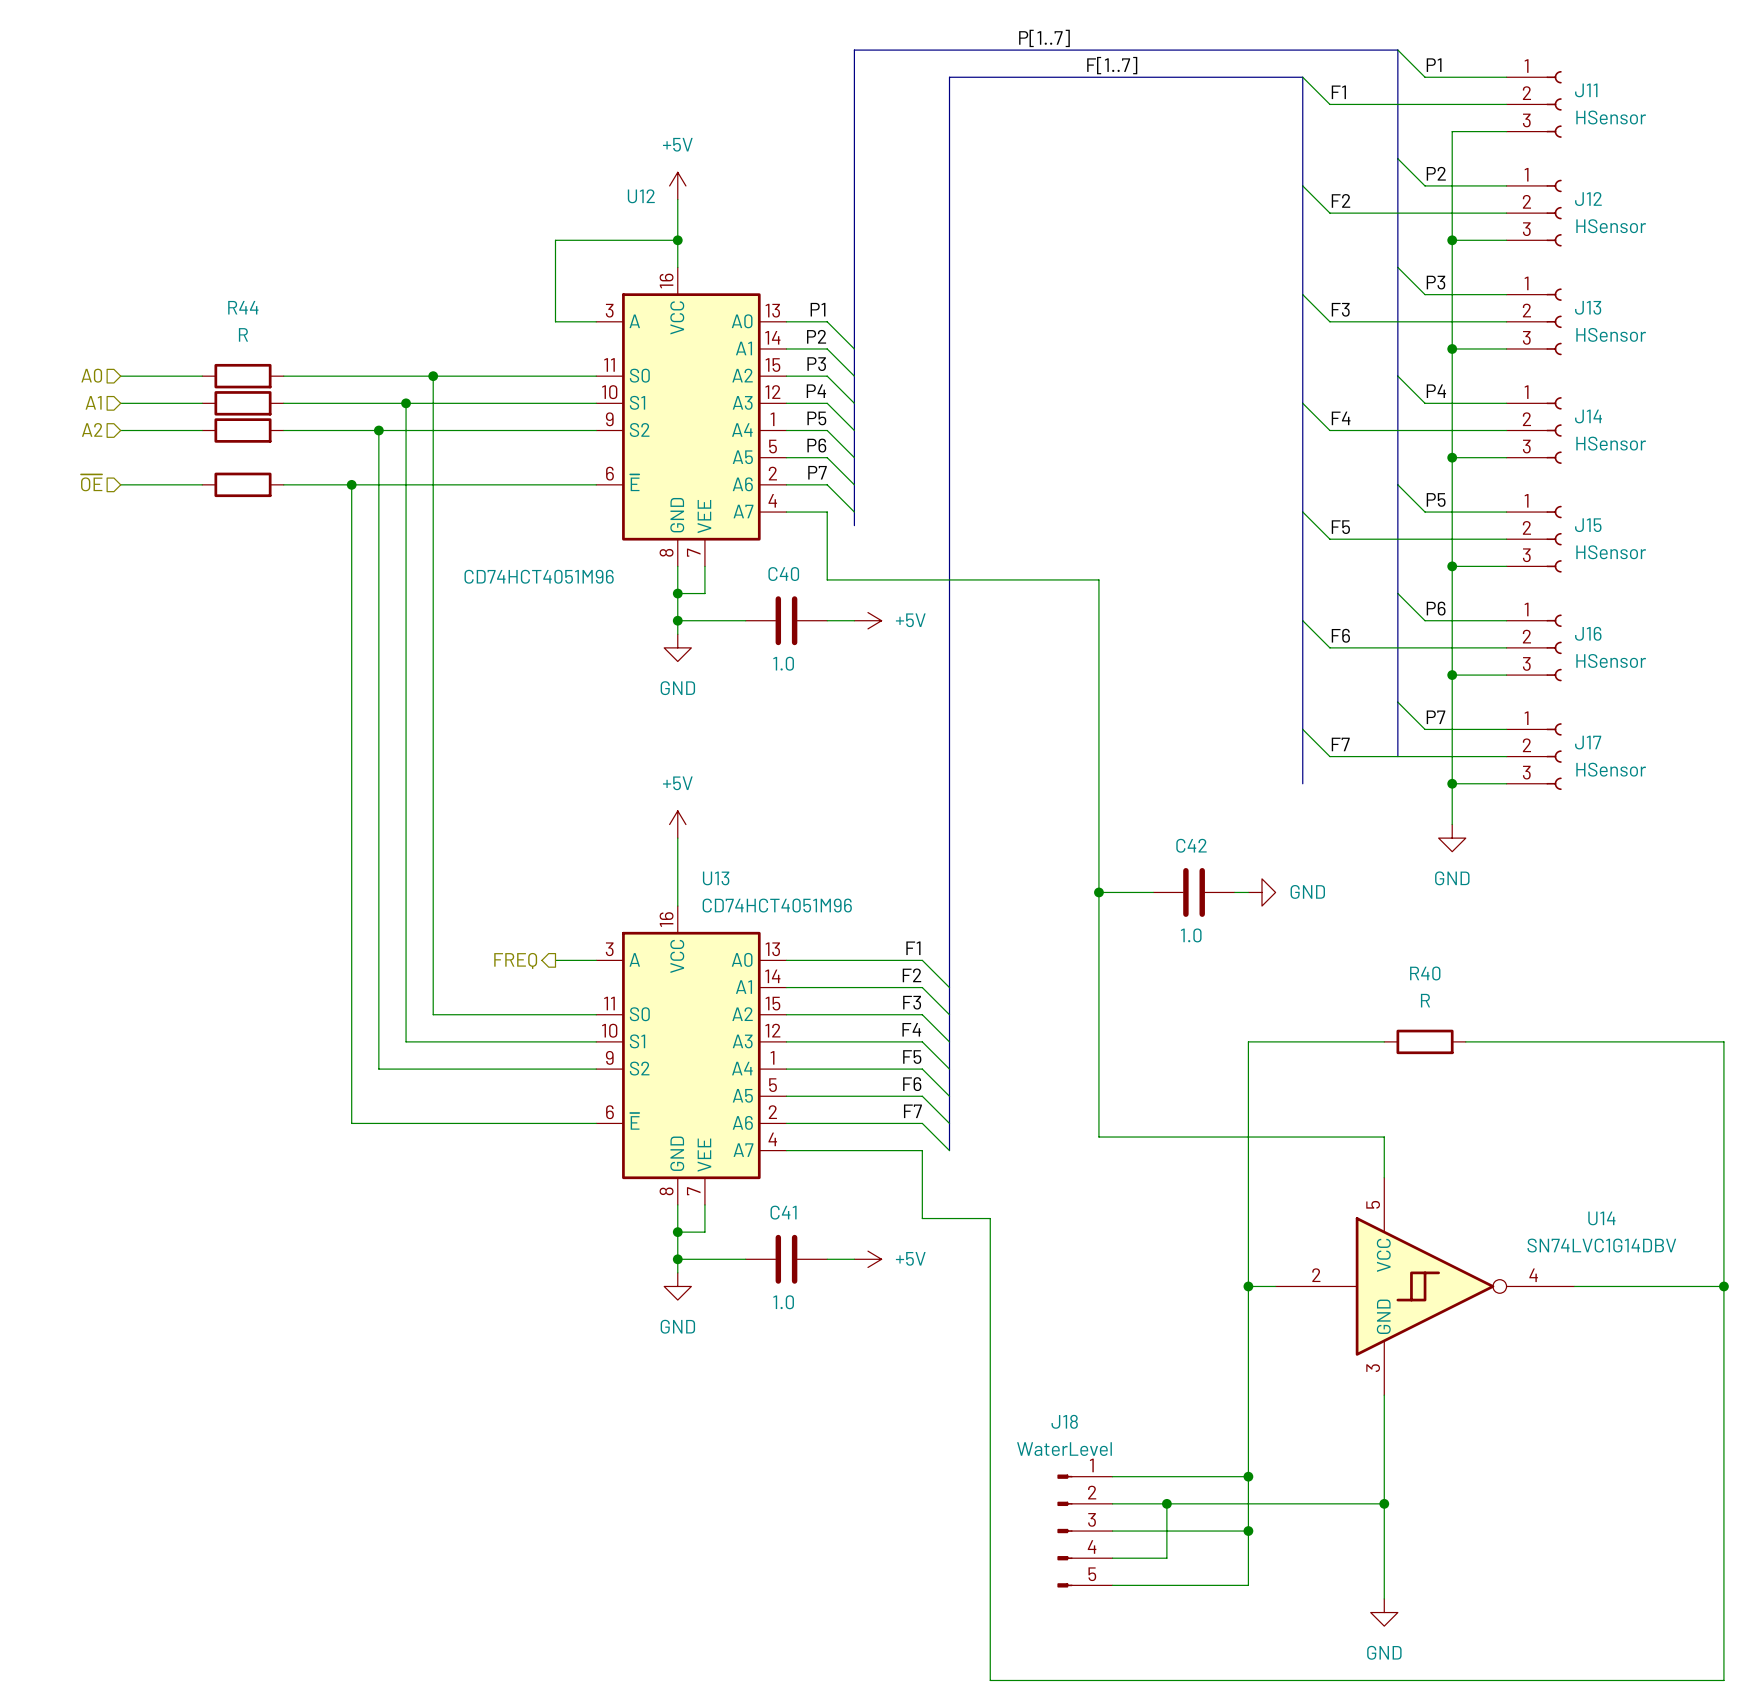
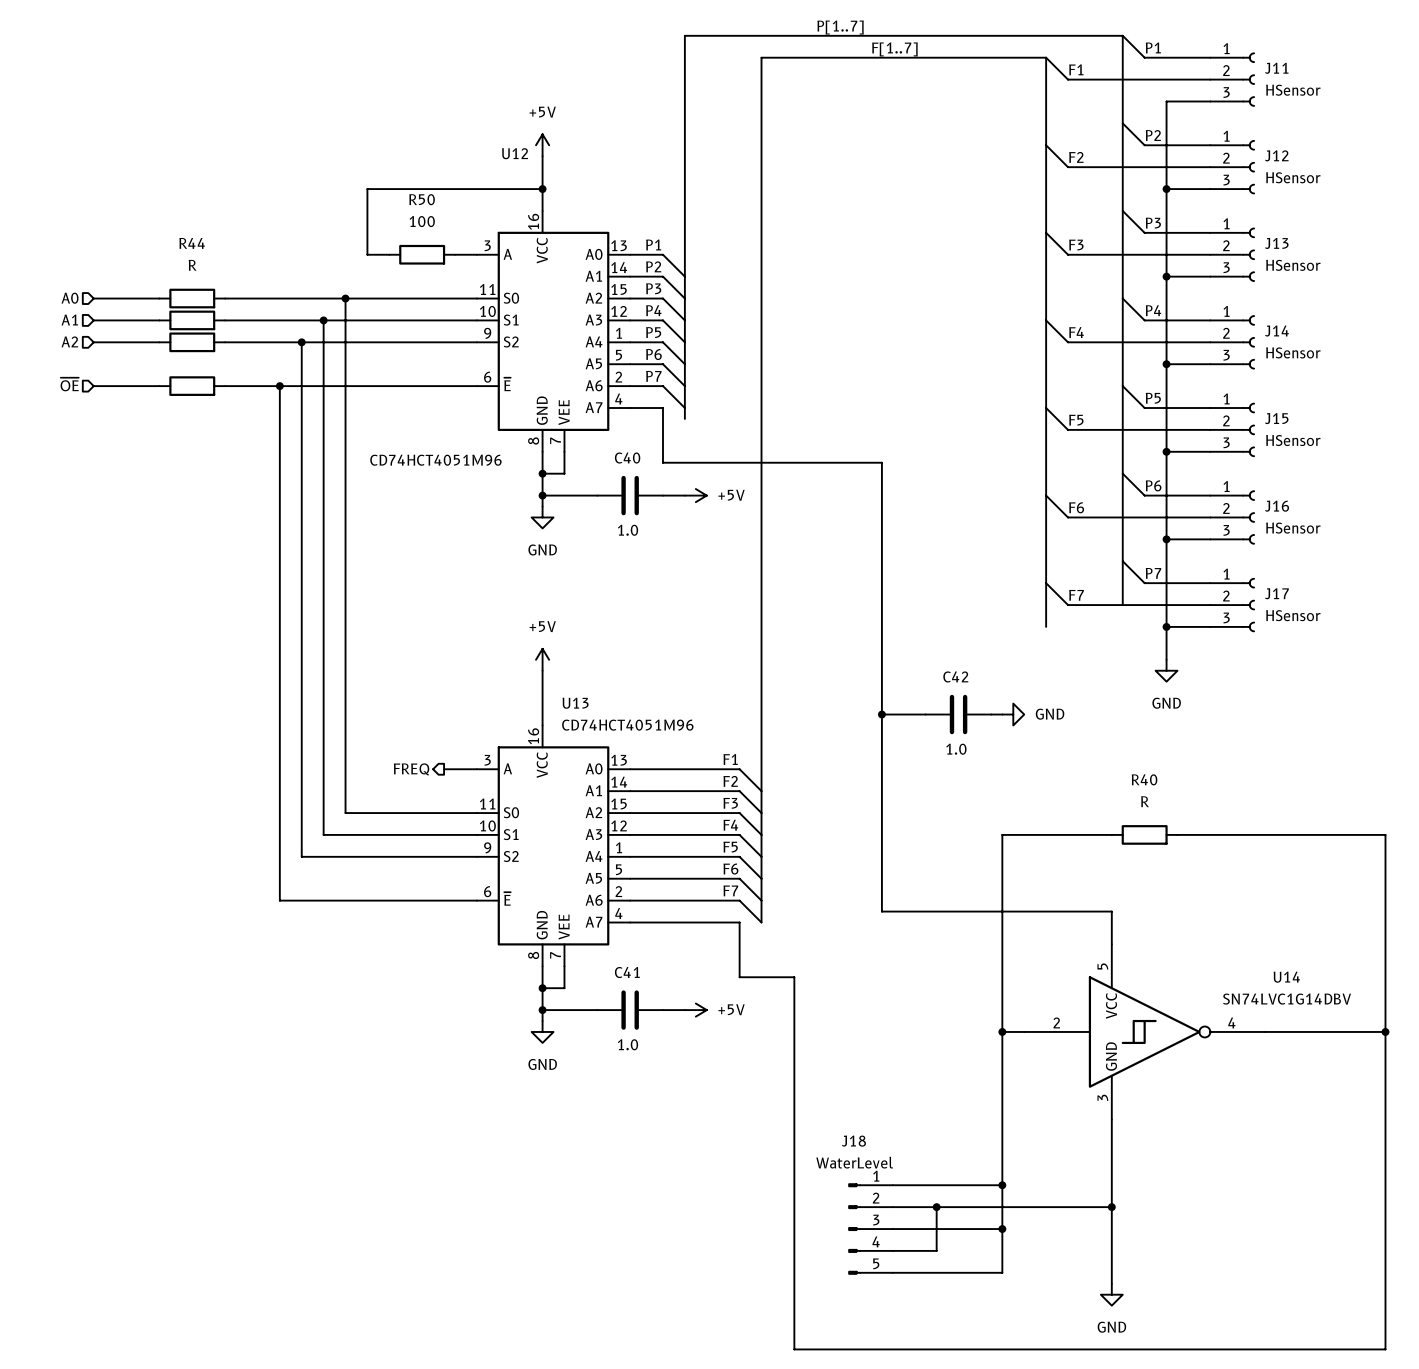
wire: (555, 240) (555, 321) (569, 321) -> (444, 189) (367, 189) (367, 254) (389, 254)
R50: none -> 100 (422, 254)

